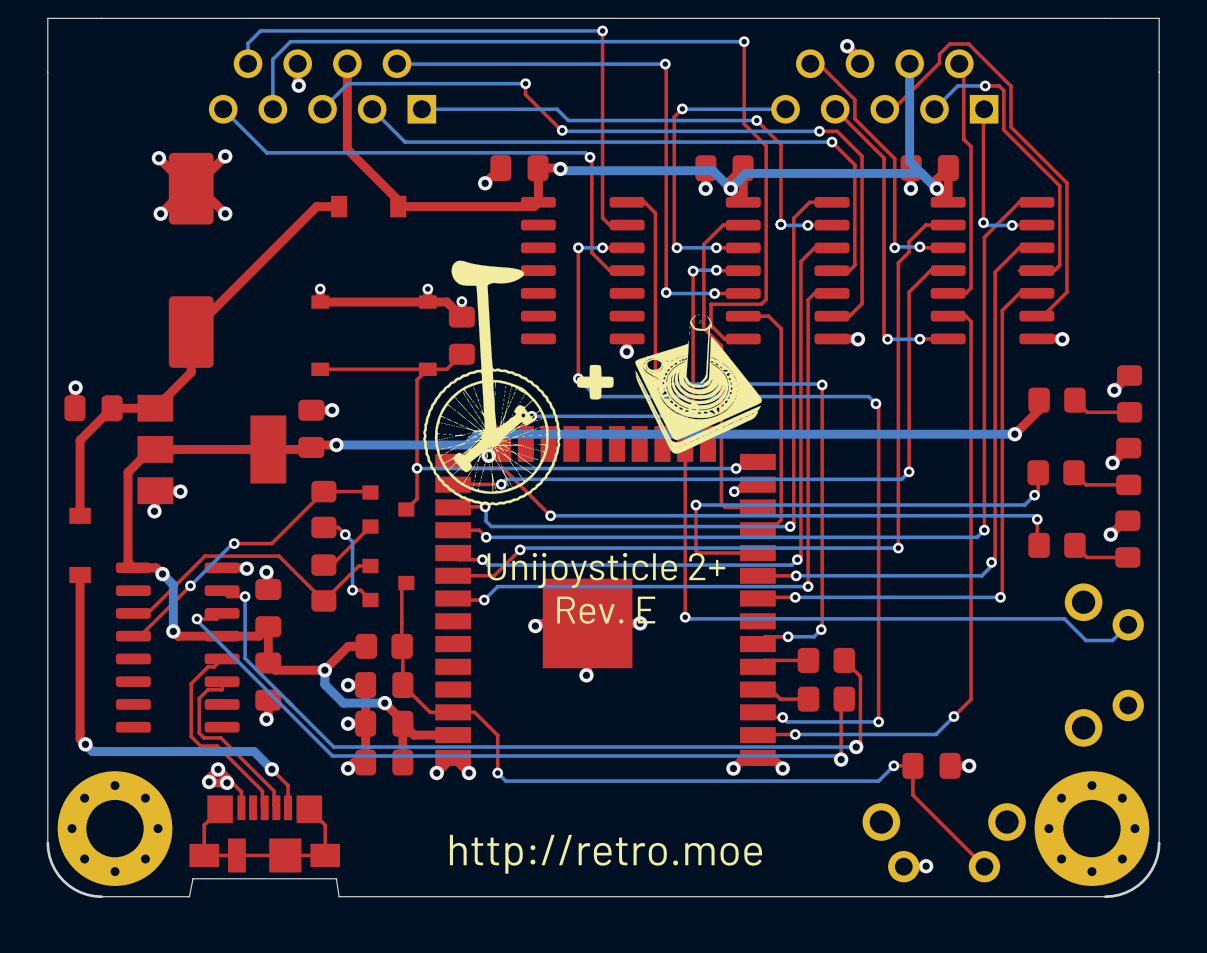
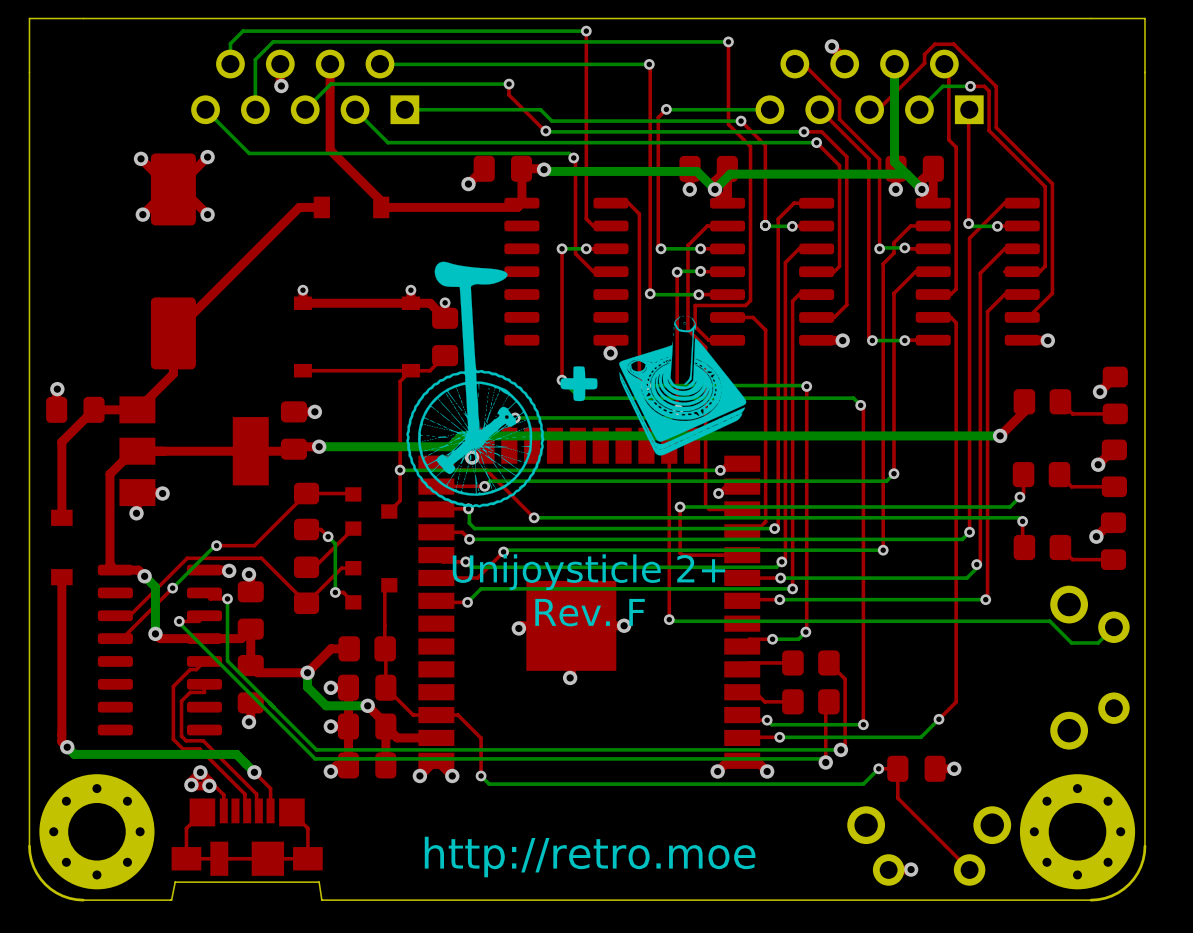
text: Rev. E (606, 610) -> Rev. F (590, 612)

